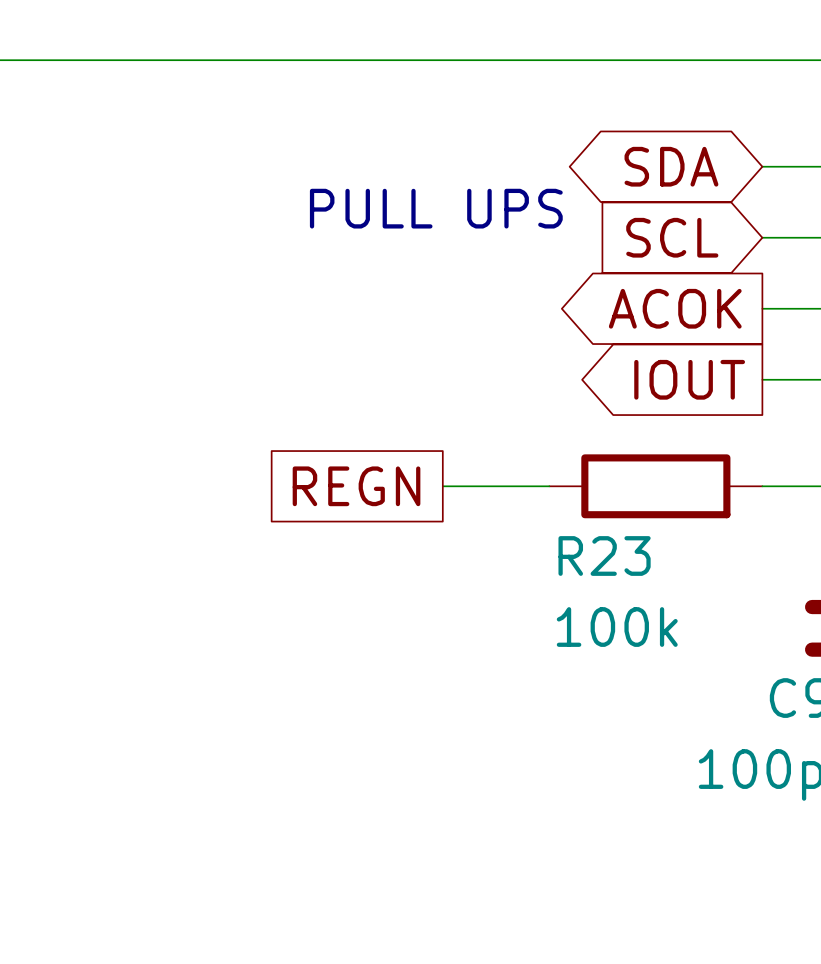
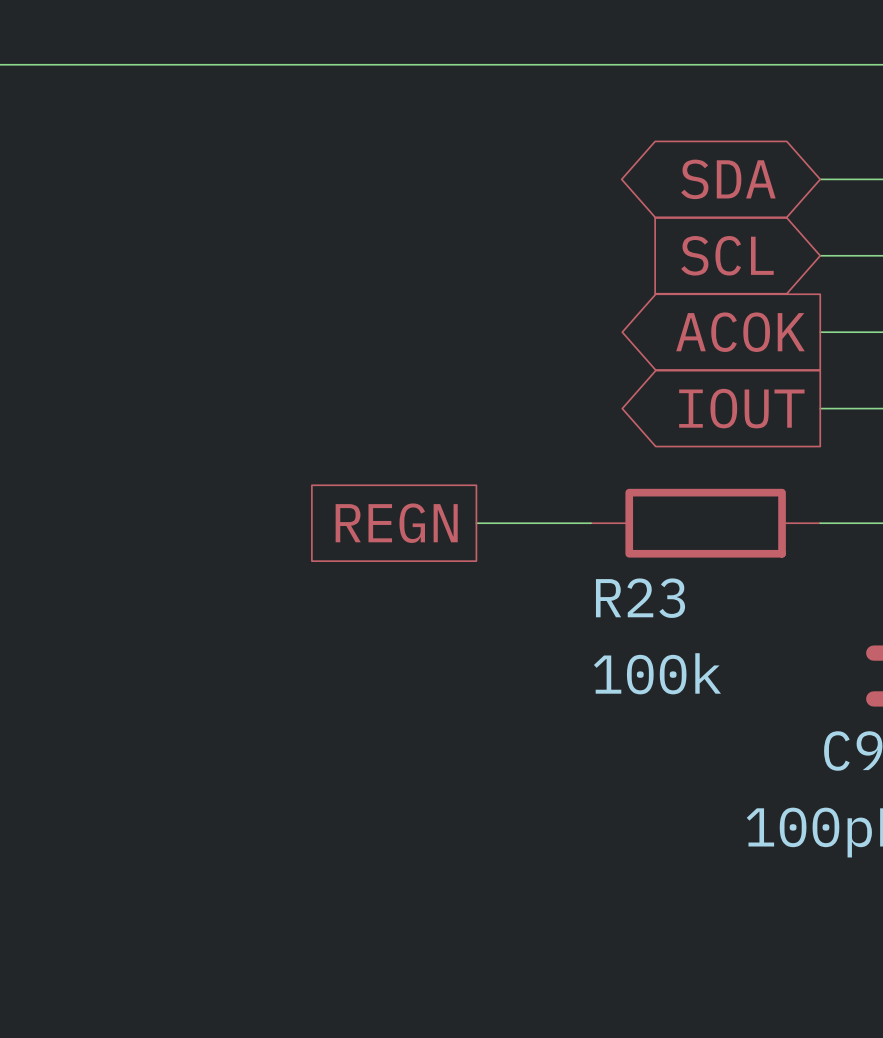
text: PULL UPS (436, 208) -> none

